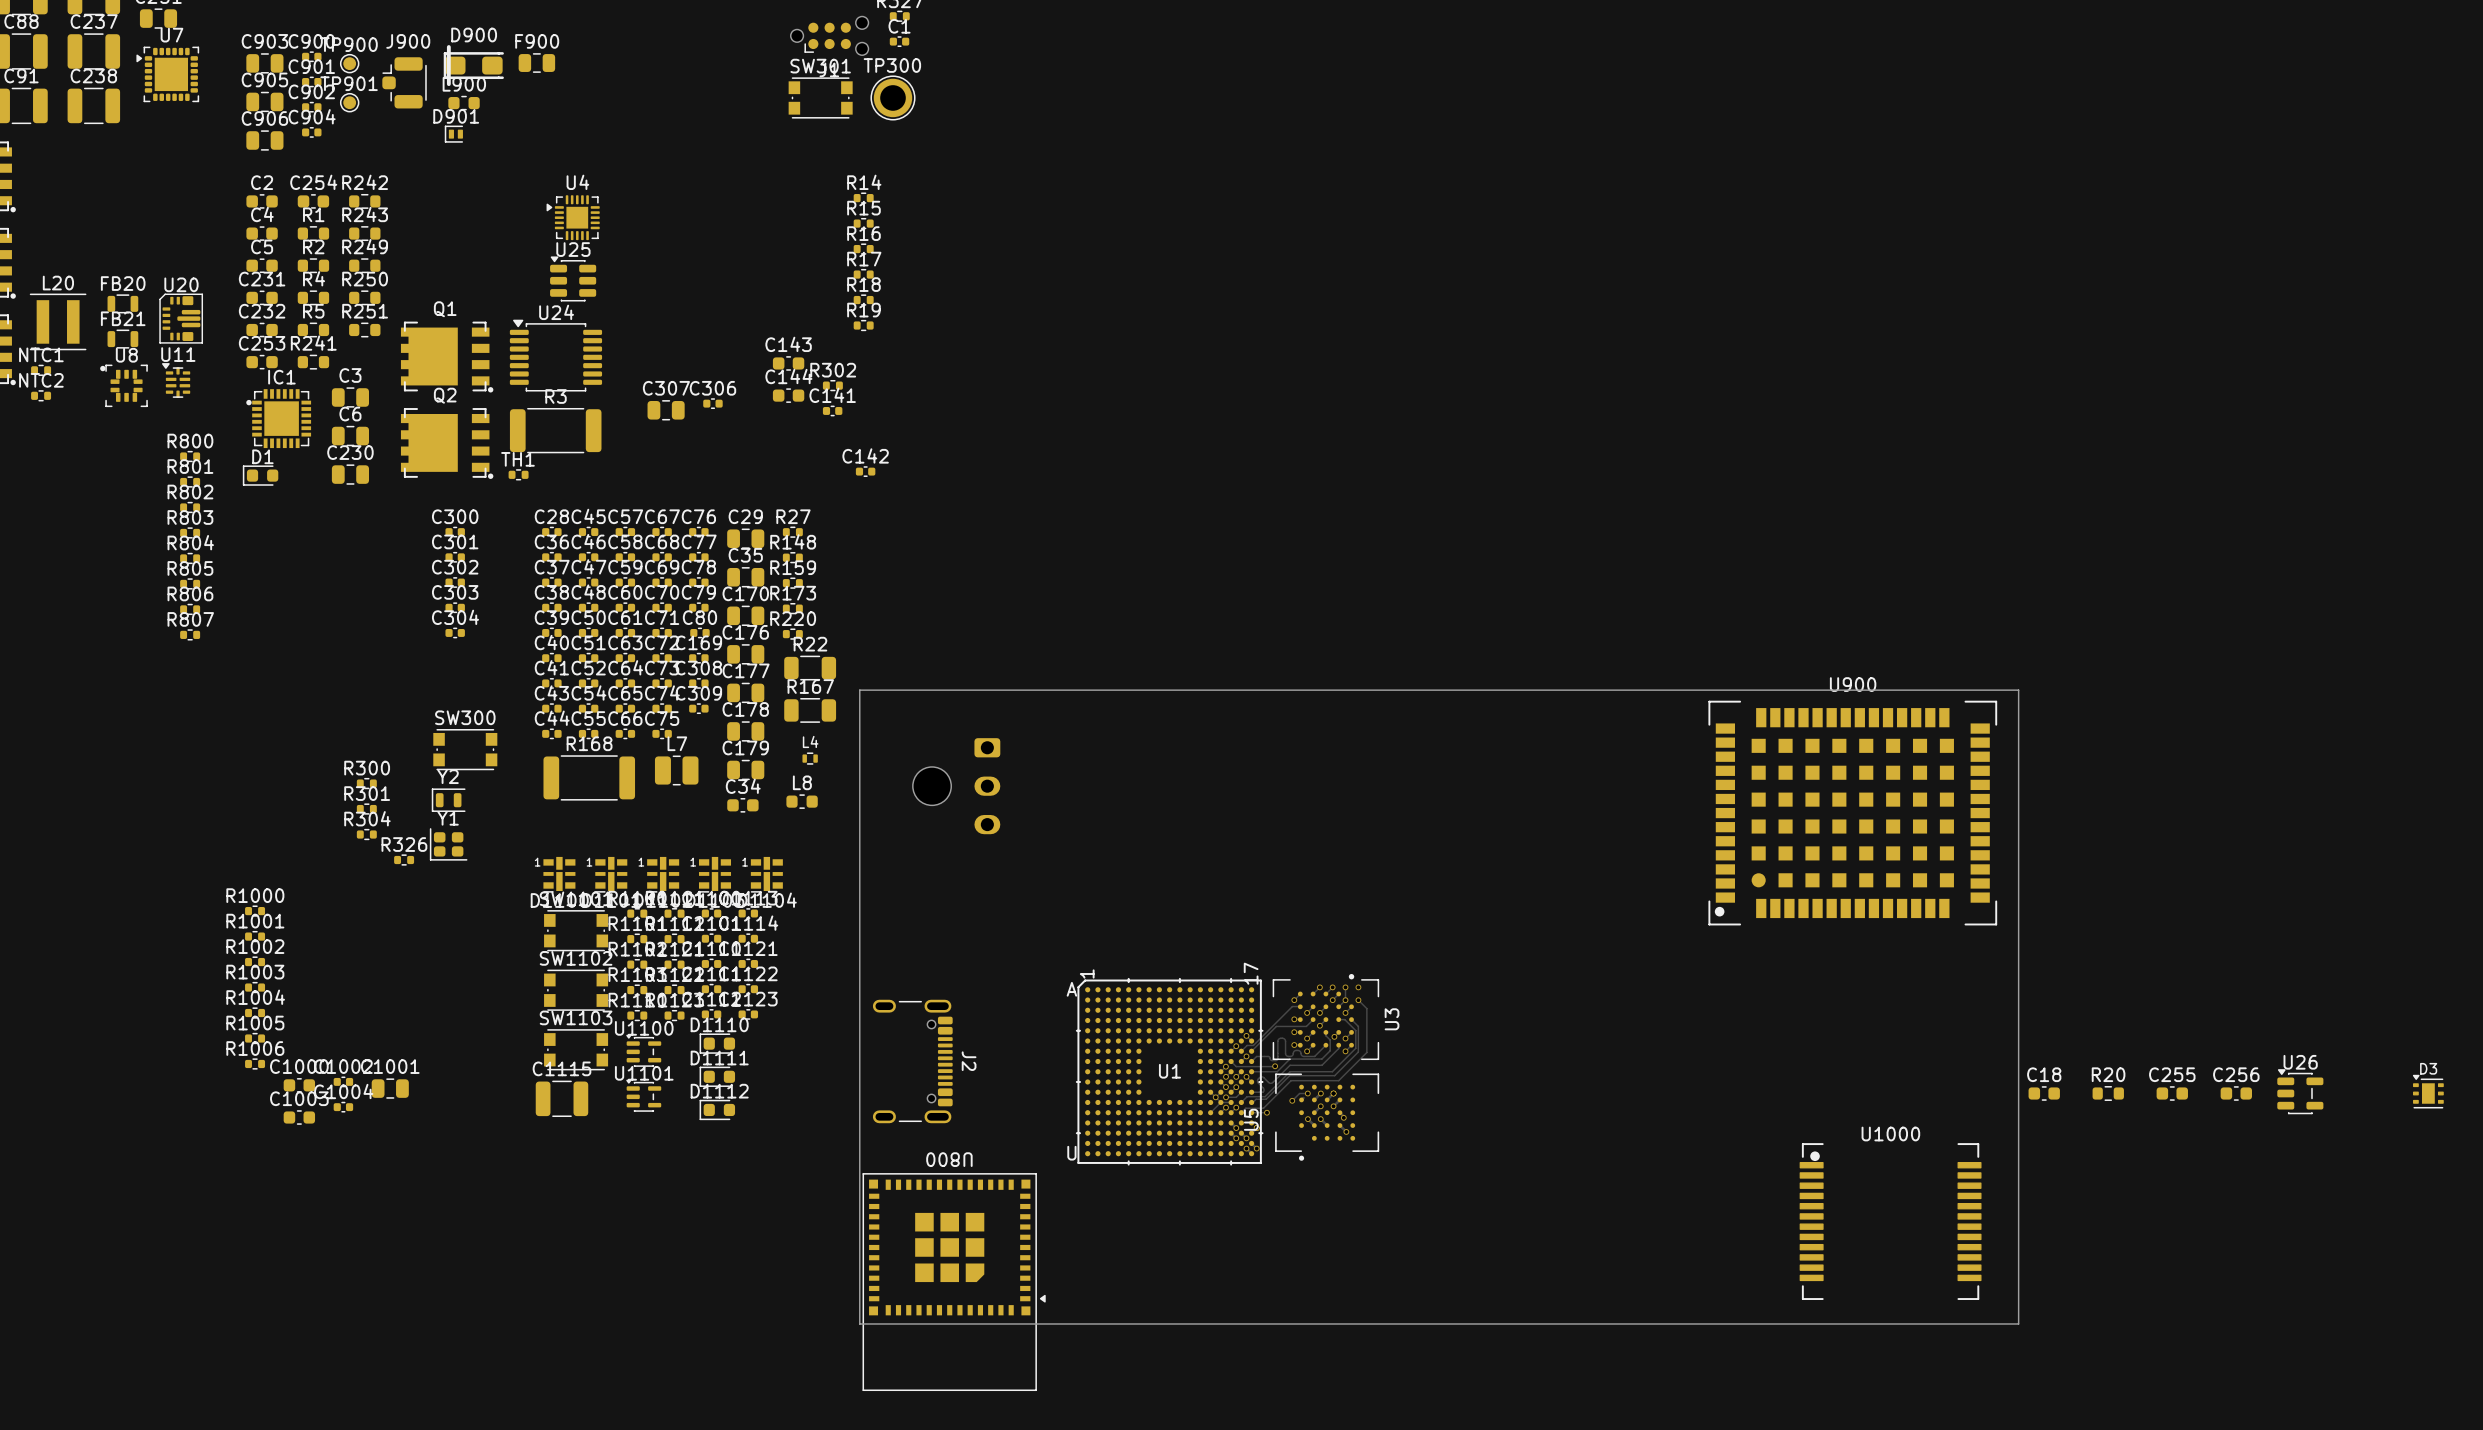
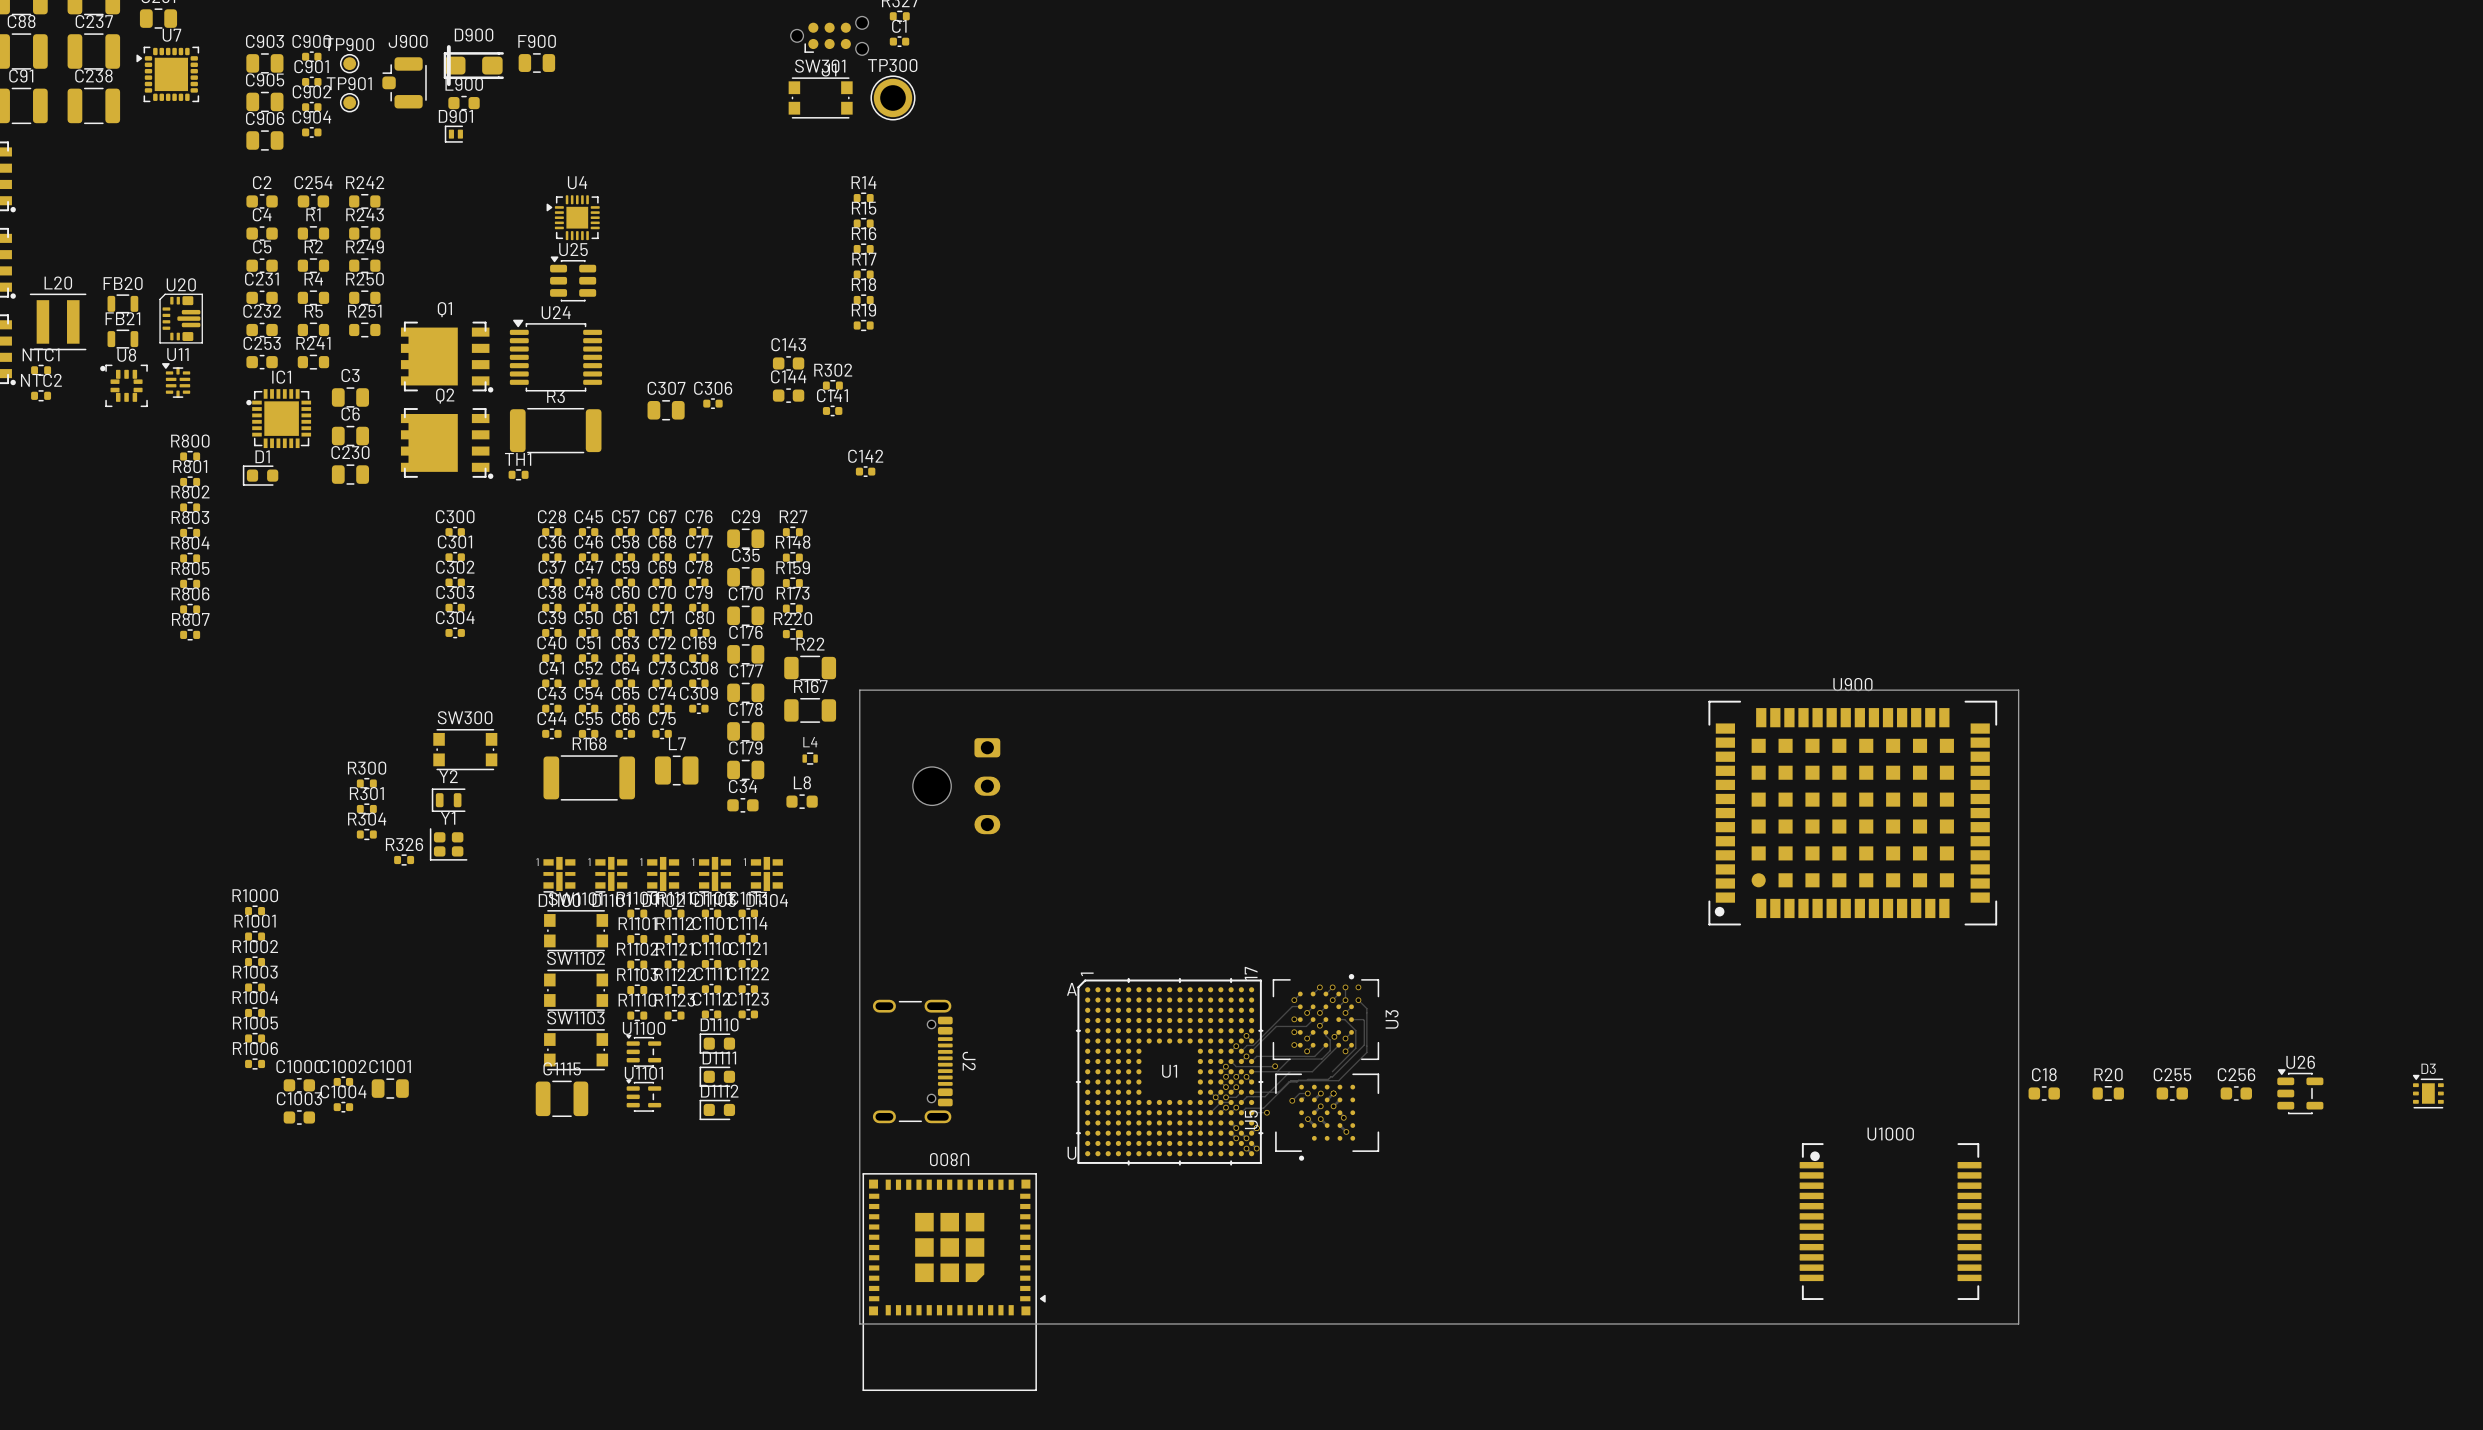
track: (1351, 1019) (1358, 1026) (1358, 1051) (1334, 1075) (1289, 1075) (1266, 1099) (1256, 1099) (1251, 1102) -> (1351, 1019) (1364, 1020) (1364, 1045) (1332, 1076) (1328, 1079) (1288, 1081) (1278, 1092) (1263, 1092)
track: (1338, 1045) (1338, 1048) (1321, 1065) (1290, 1065) (1271, 1083) (1260, 1077) (1257, 1081) (1263, 1088) (1263, 1092) -> none
track: (1256, 1056) (1268, 1056) (1271, 1060) (1277, 1060) (1277, 1040) (1280, 1038) (1285, 1040) (1286, 1055) (1291, 1056) (1294, 1051) (1297, 1050) (1304, 1056) -> (1256, 1056) (1304, 1056)
track: (1312, 1071) (1332, 1071) -> (1312, 1071) (1339, 1044)

